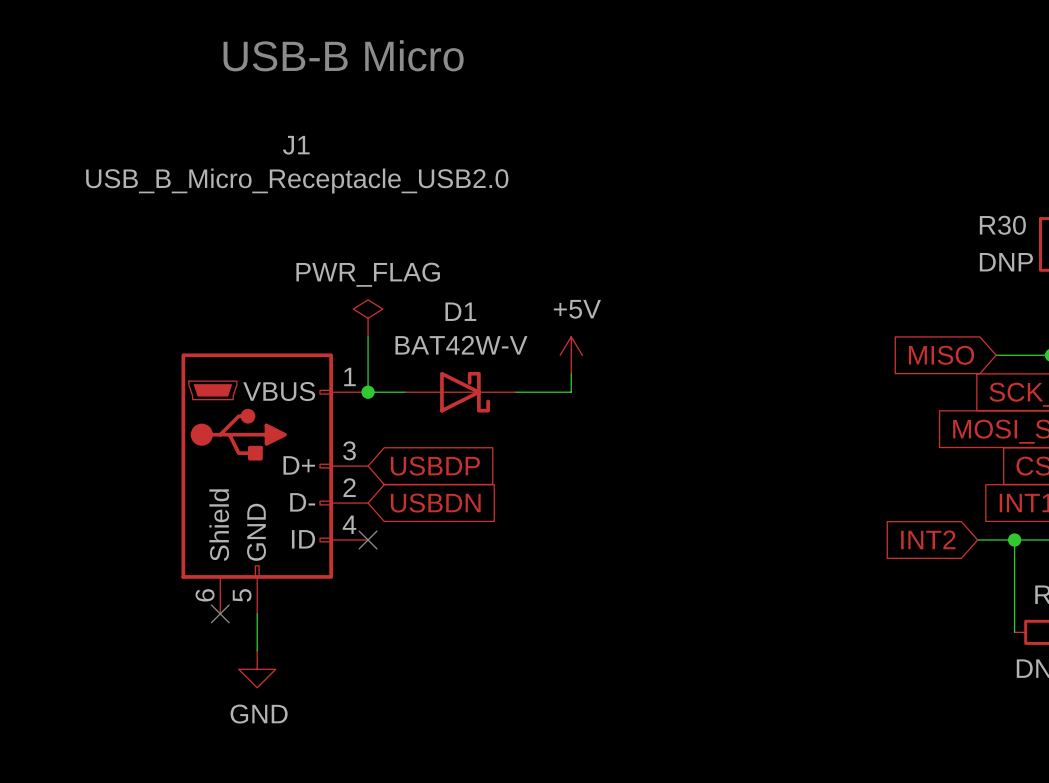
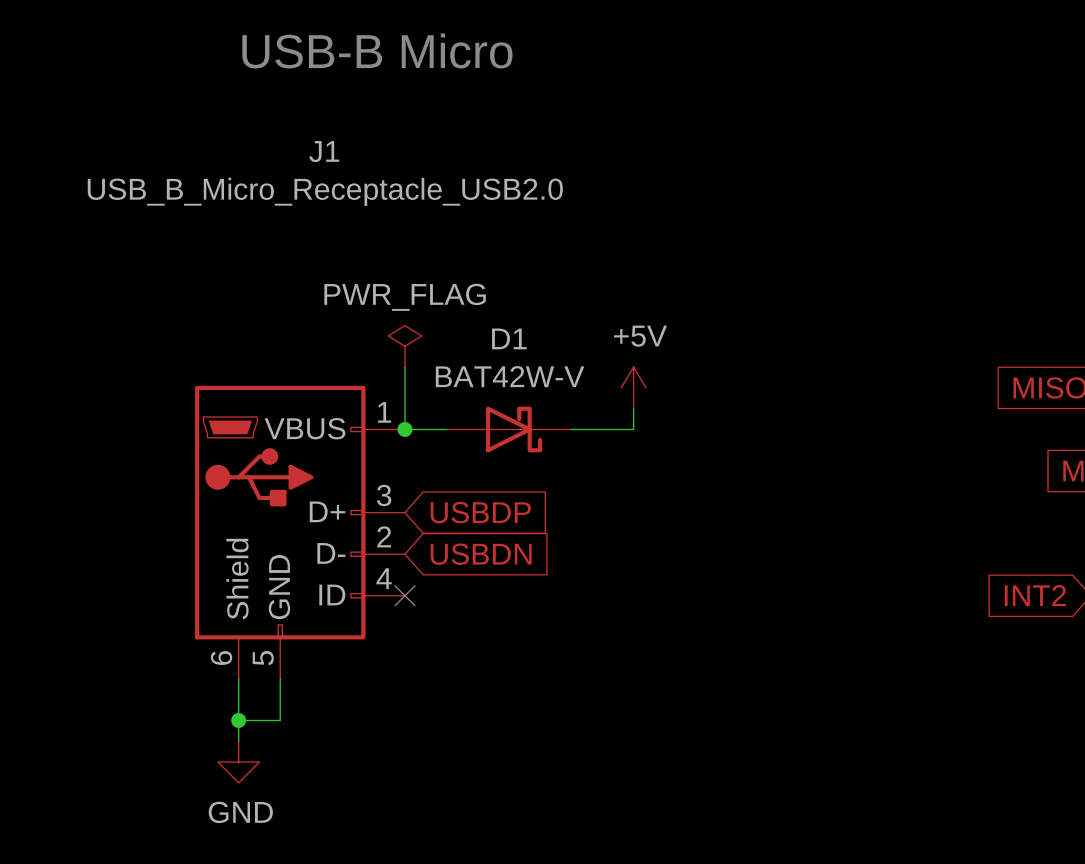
wire: none -> (238, 678) (238, 741)
no-connect mark: (220, 613) -> none
wire: none -> (238, 720) (280, 720)
junction: none -> (238, 720)
power symbol position: GND (257, 669) -> GND (238, 762)

